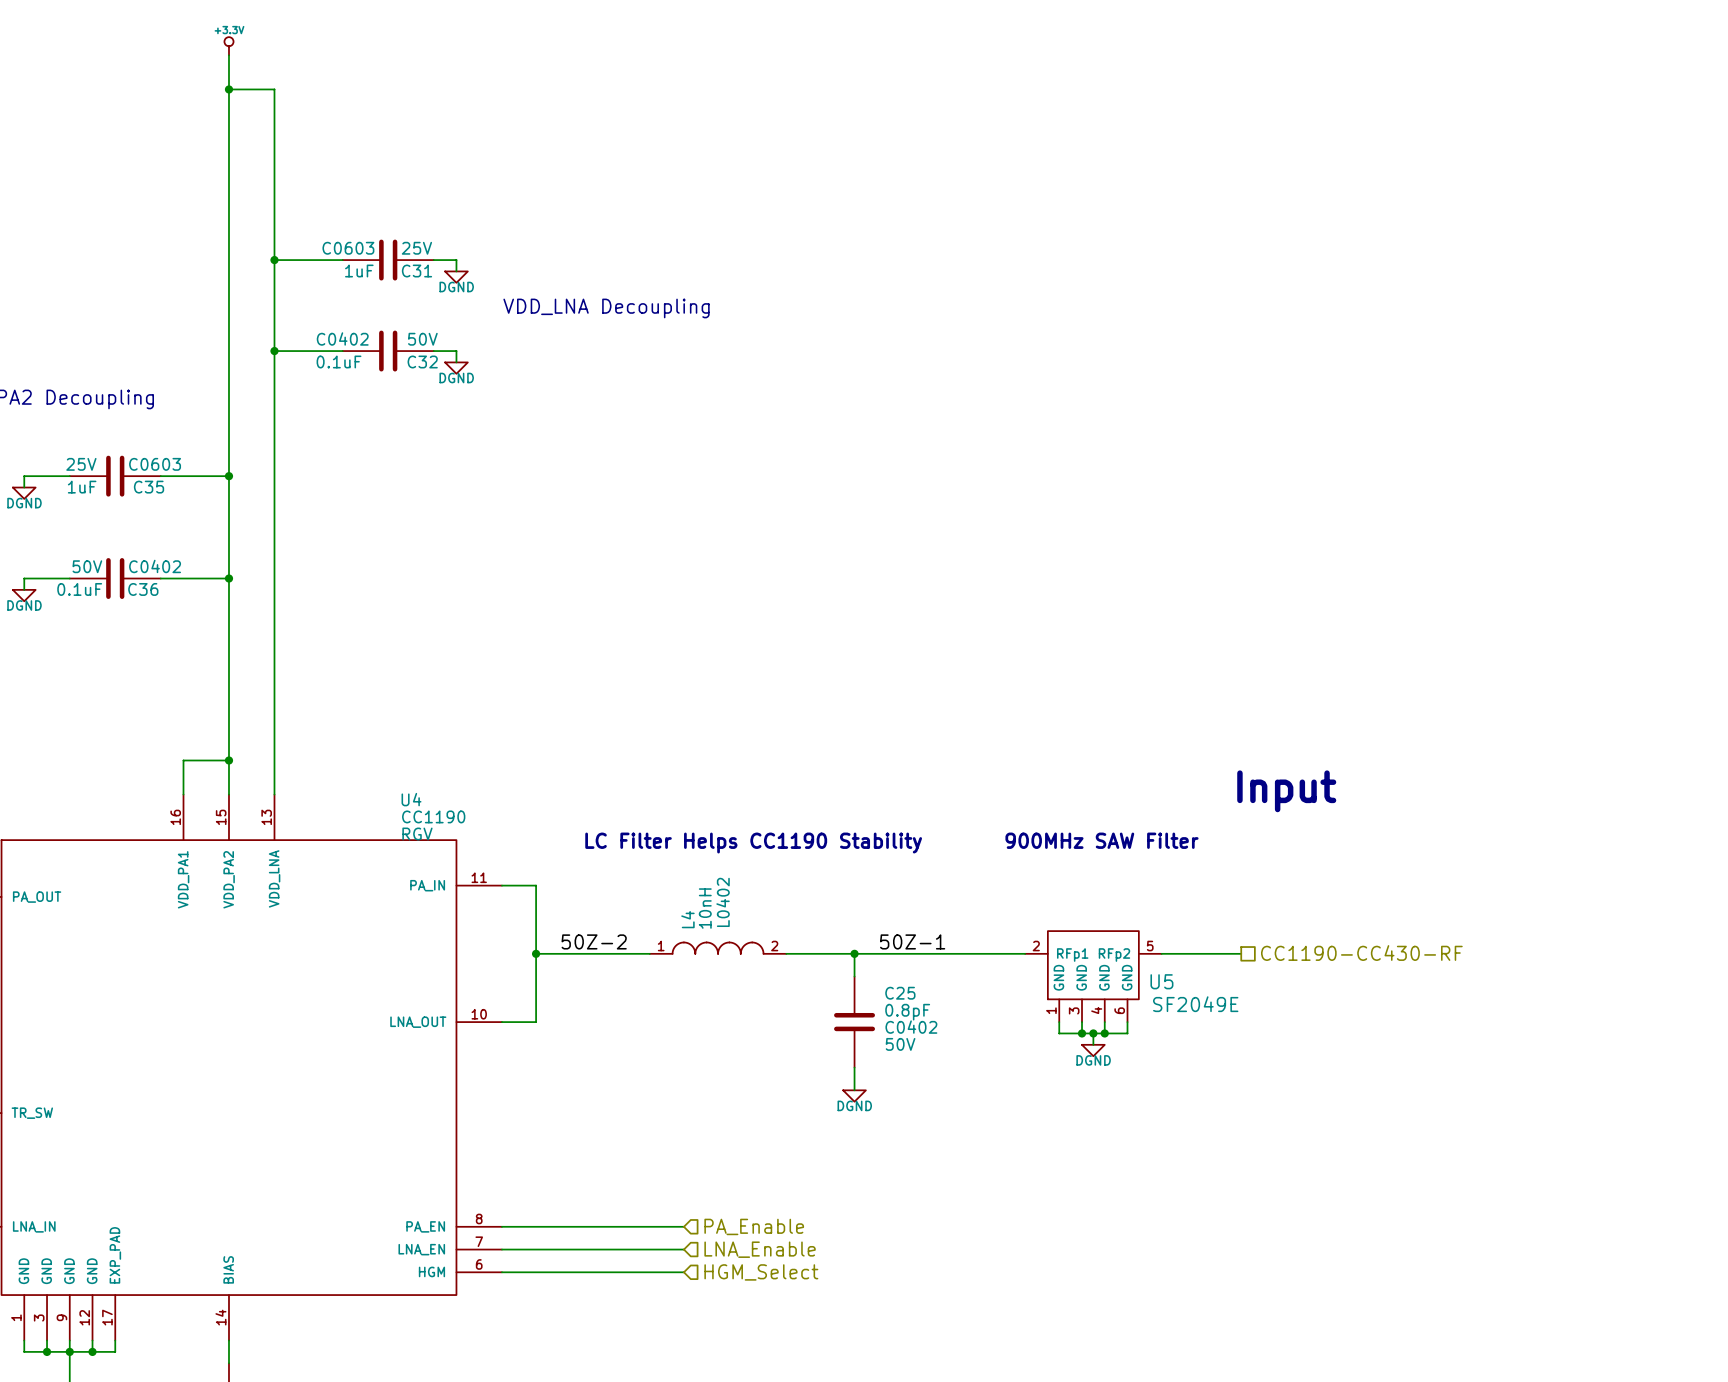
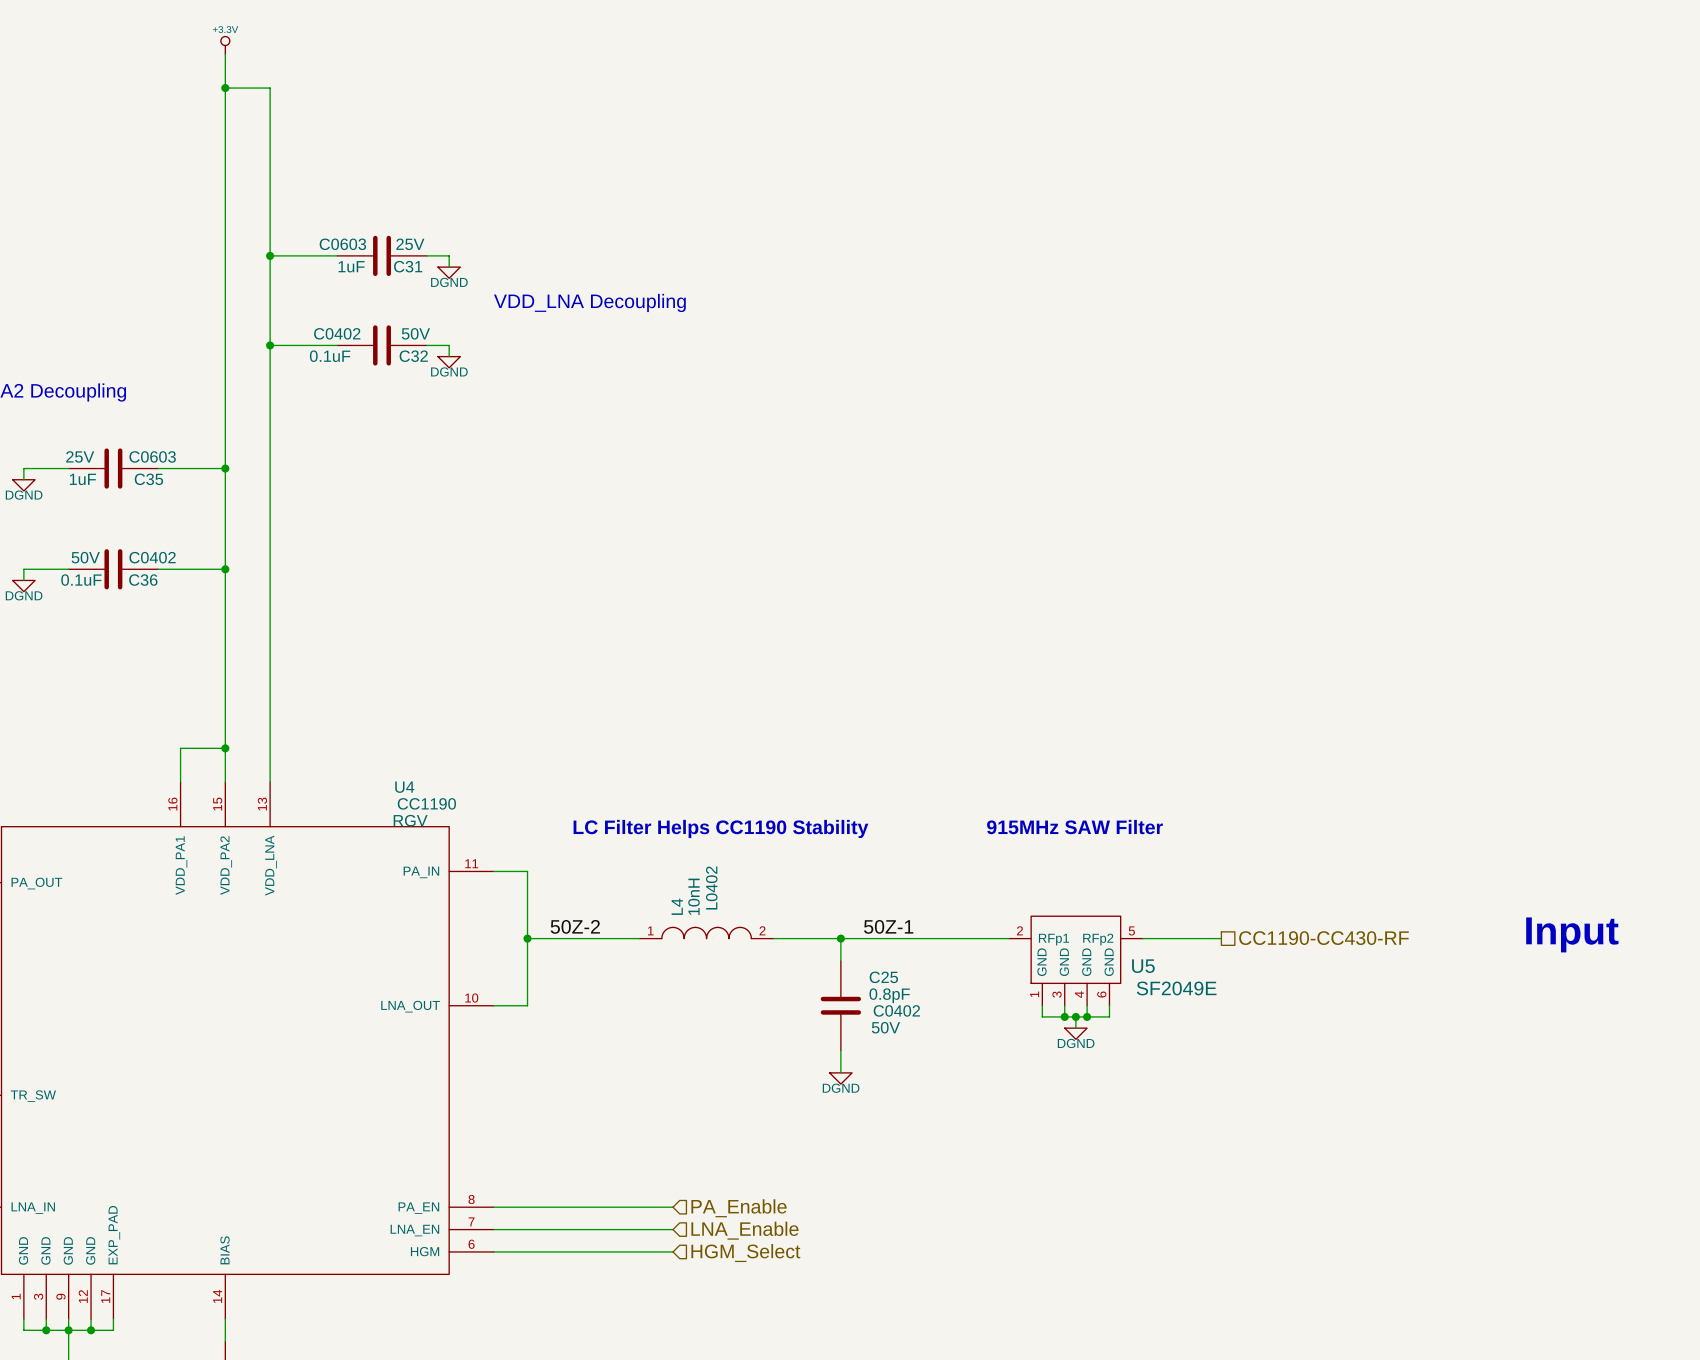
text: Input (1286, 791) -> none
text: 900MHz SAW Filter (1101, 840) -> 915MHz SAW Filter (1074, 827)
text: none -> Input (1572, 934)

